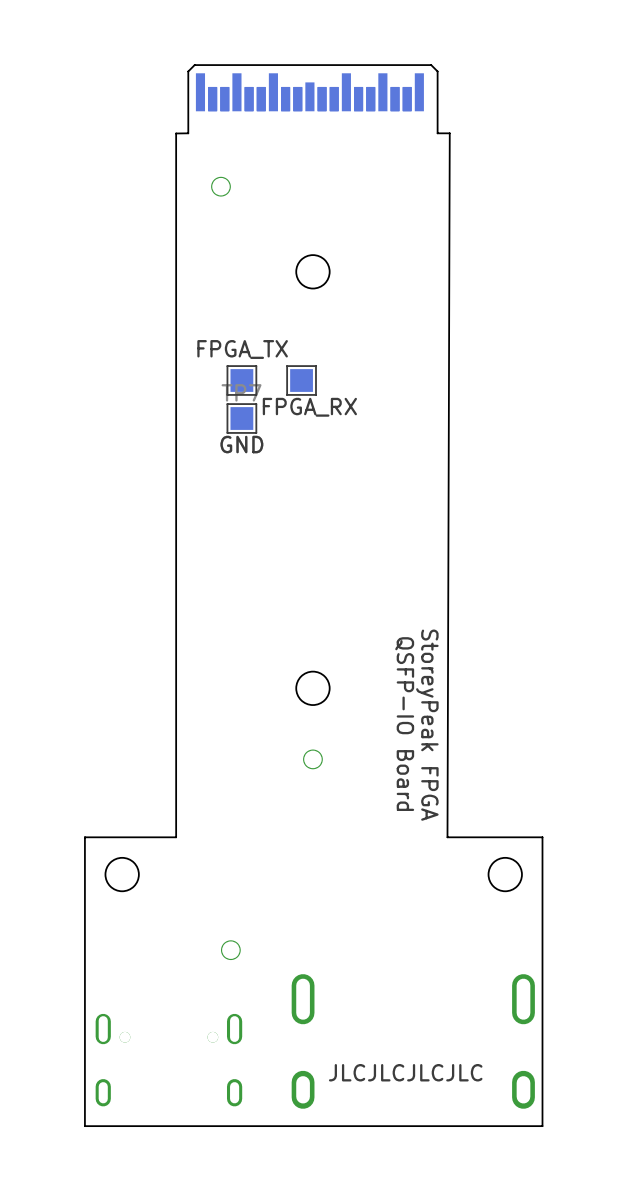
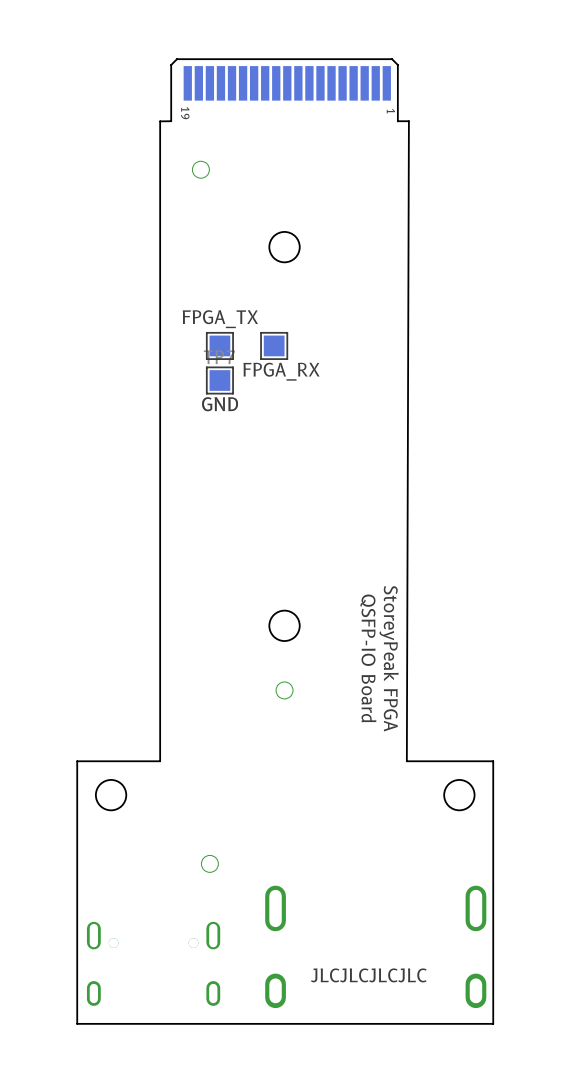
part footprint: [195, 73, 424, 112] -> [183, 66, 391, 101]

